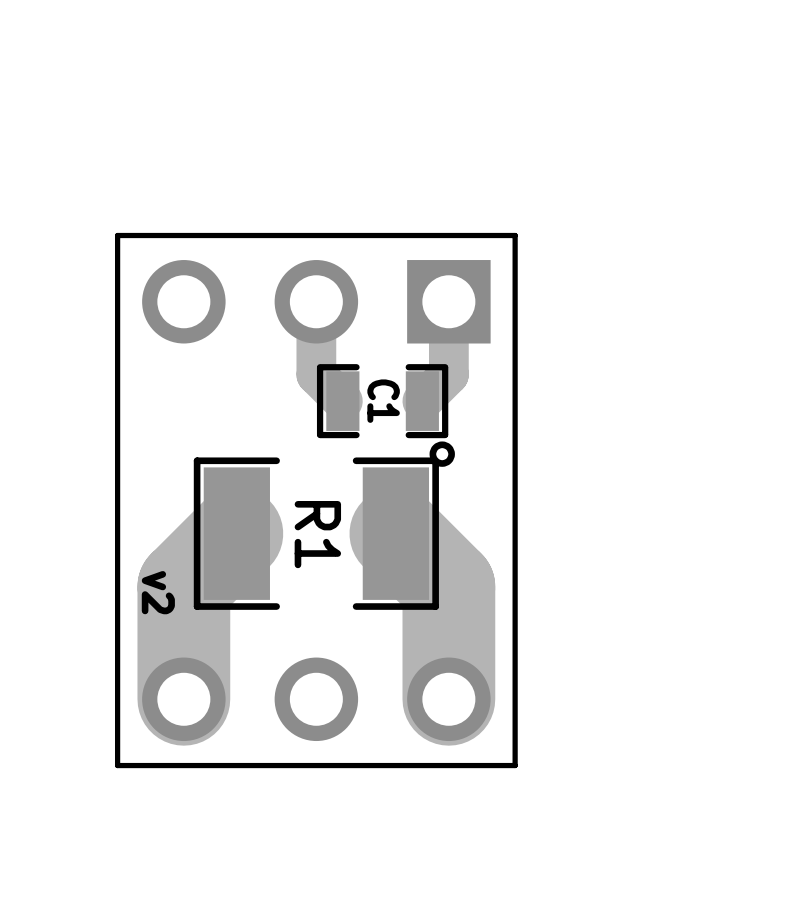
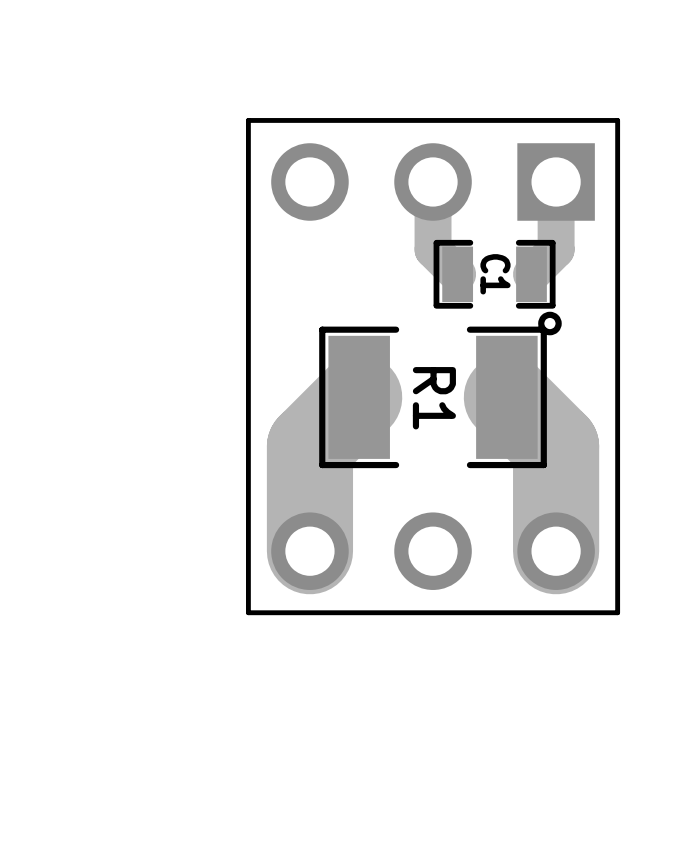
text: v2 (158, 592) -> none

